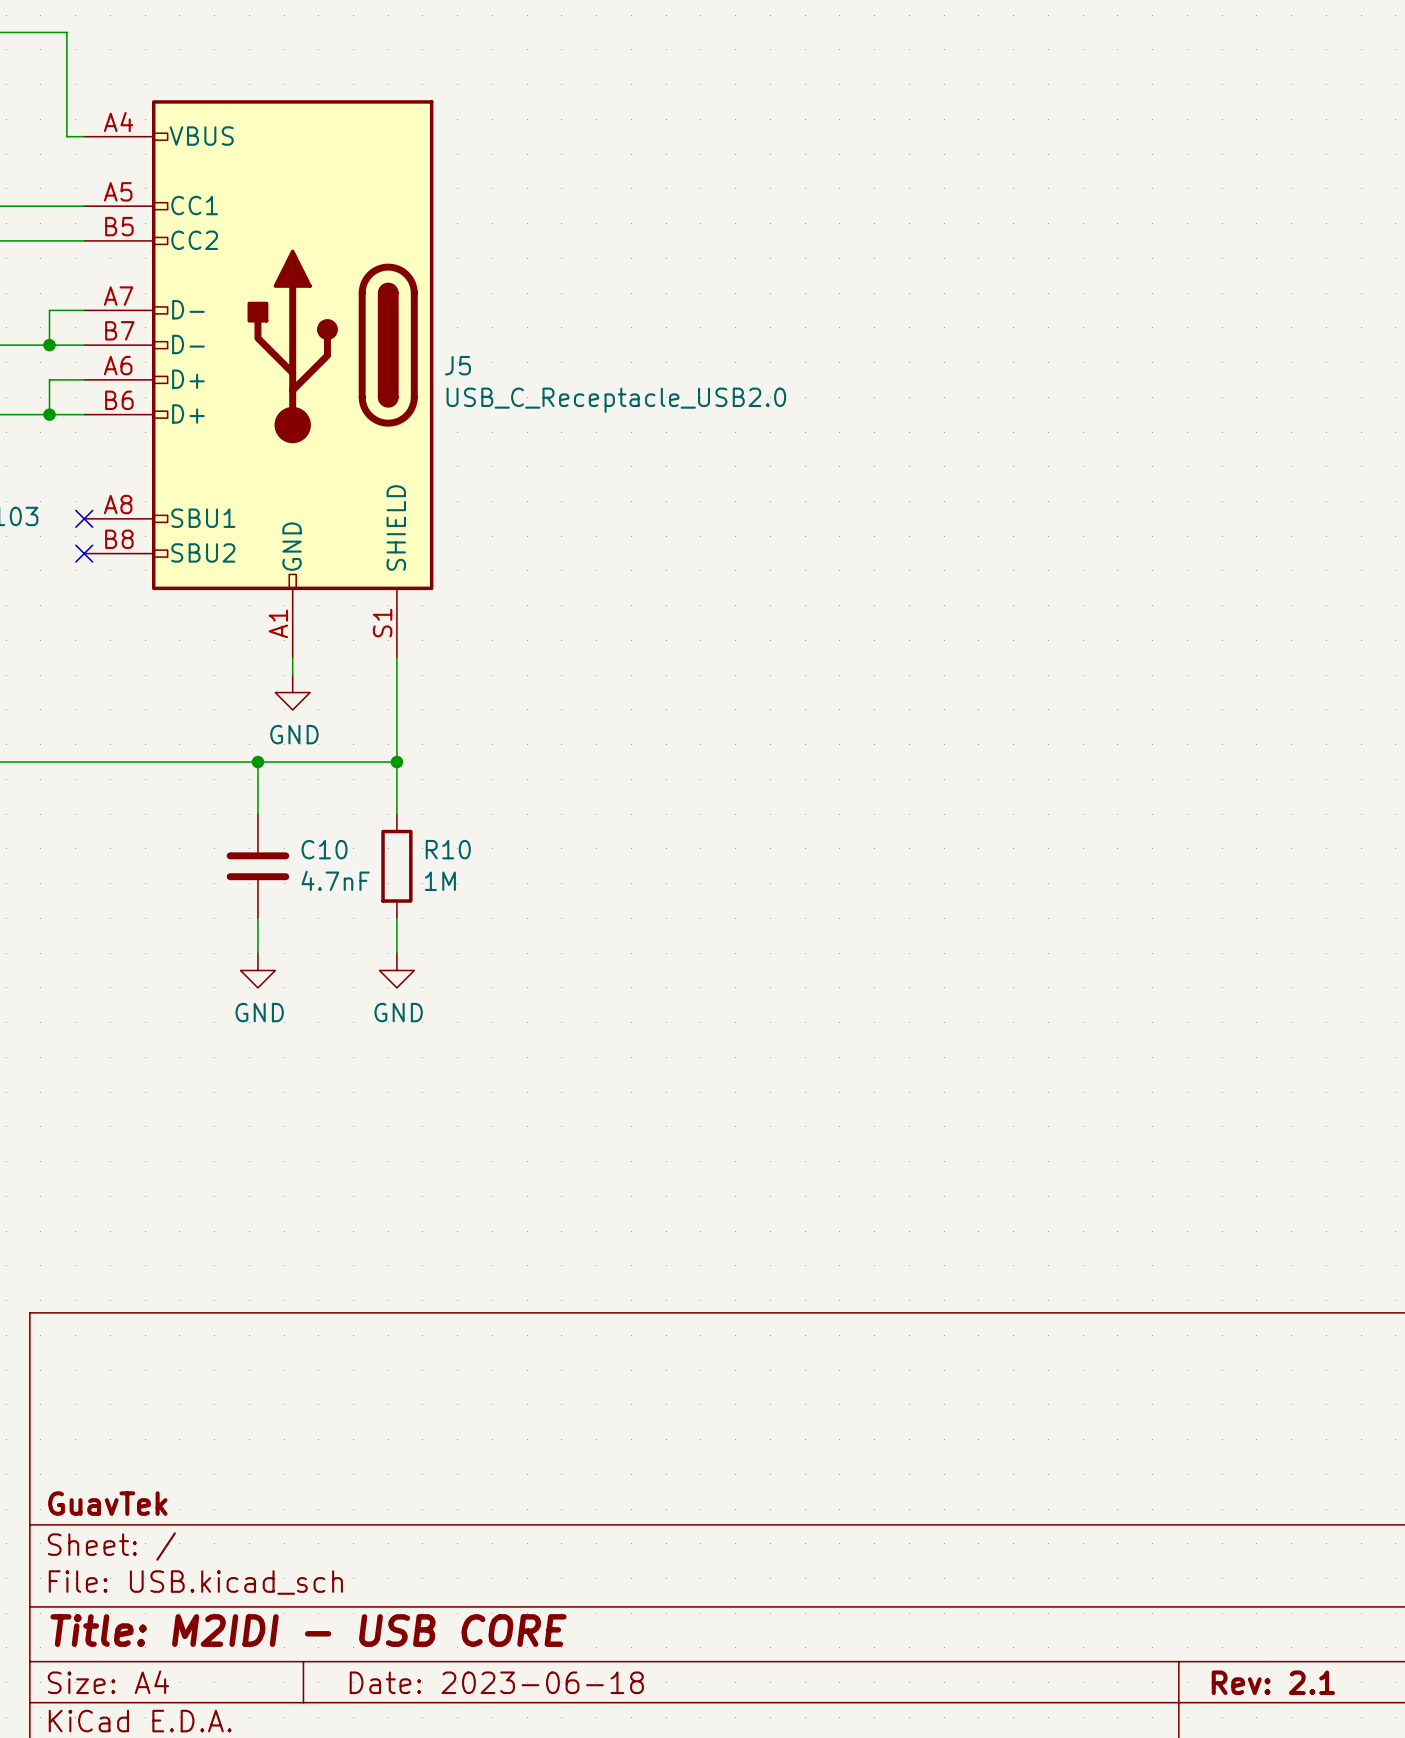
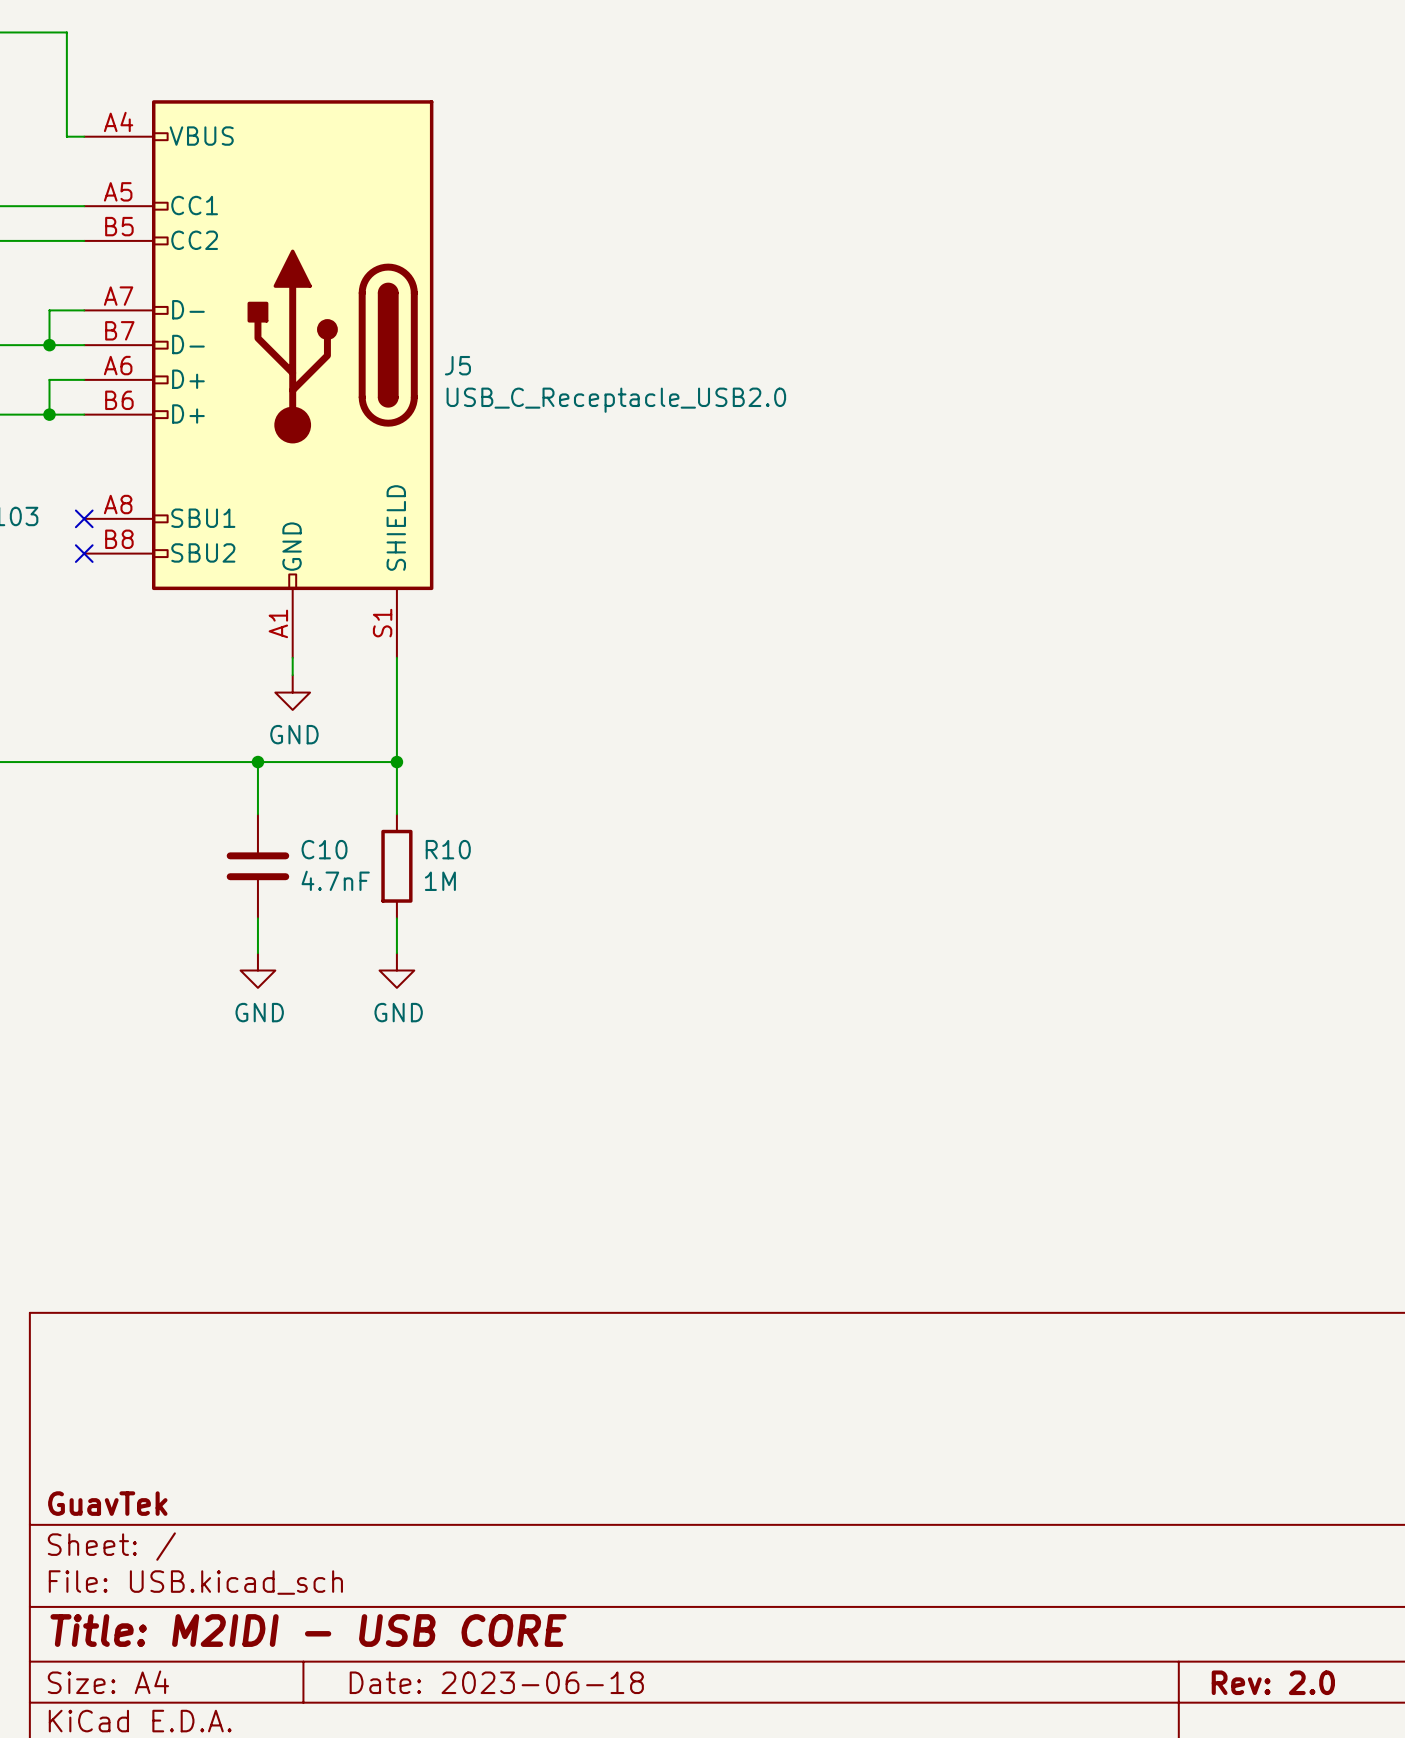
title block: Rev: 2.1 (1273, 1682) -> Rev: 2.0 (1273, 1682)

